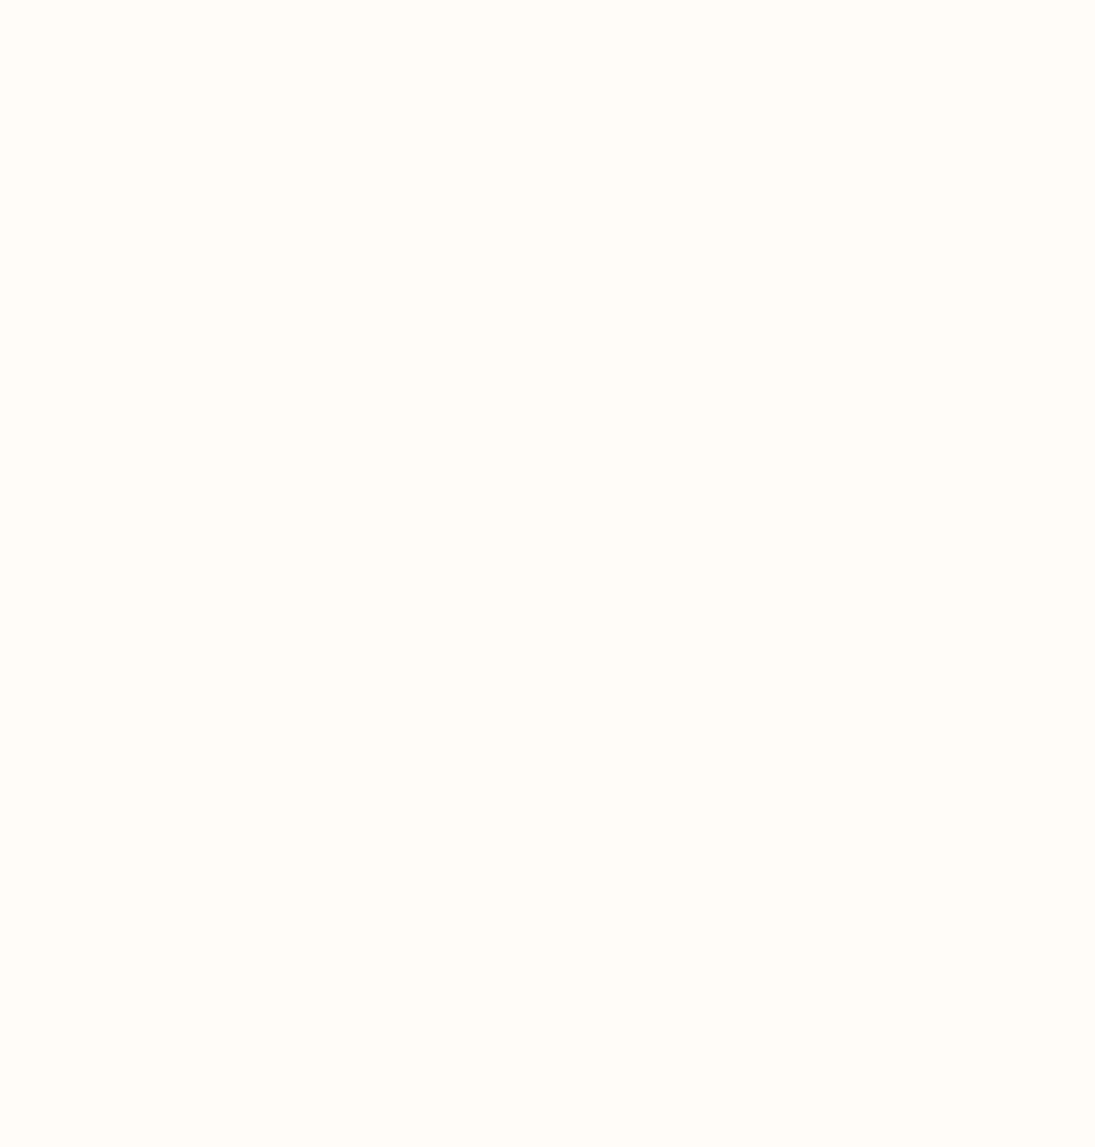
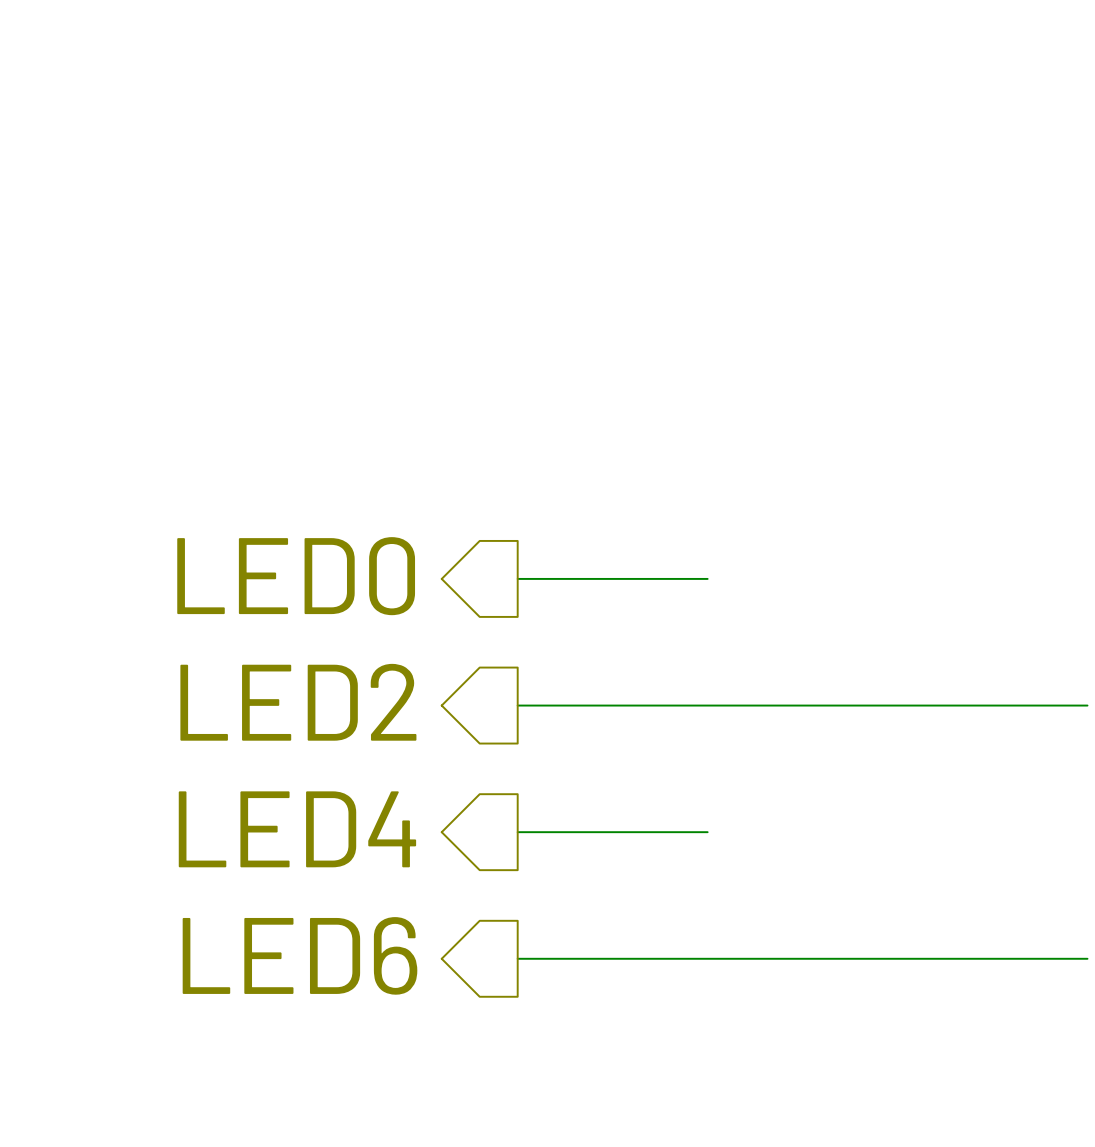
hierarchical label: none -> LED0 (296, 576)
wire: none -> (517, 578) (707, 578)
hierarchical label: none -> LED2 (298, 702)
wire: none -> (517, 705) (1087, 705)
hierarchical label: none -> LED4 (297, 829)
wire: none -> (517, 832) (707, 832)
hierarchical label: none -> LED6 (299, 955)
wire: none -> (517, 958) (1087, 958)

